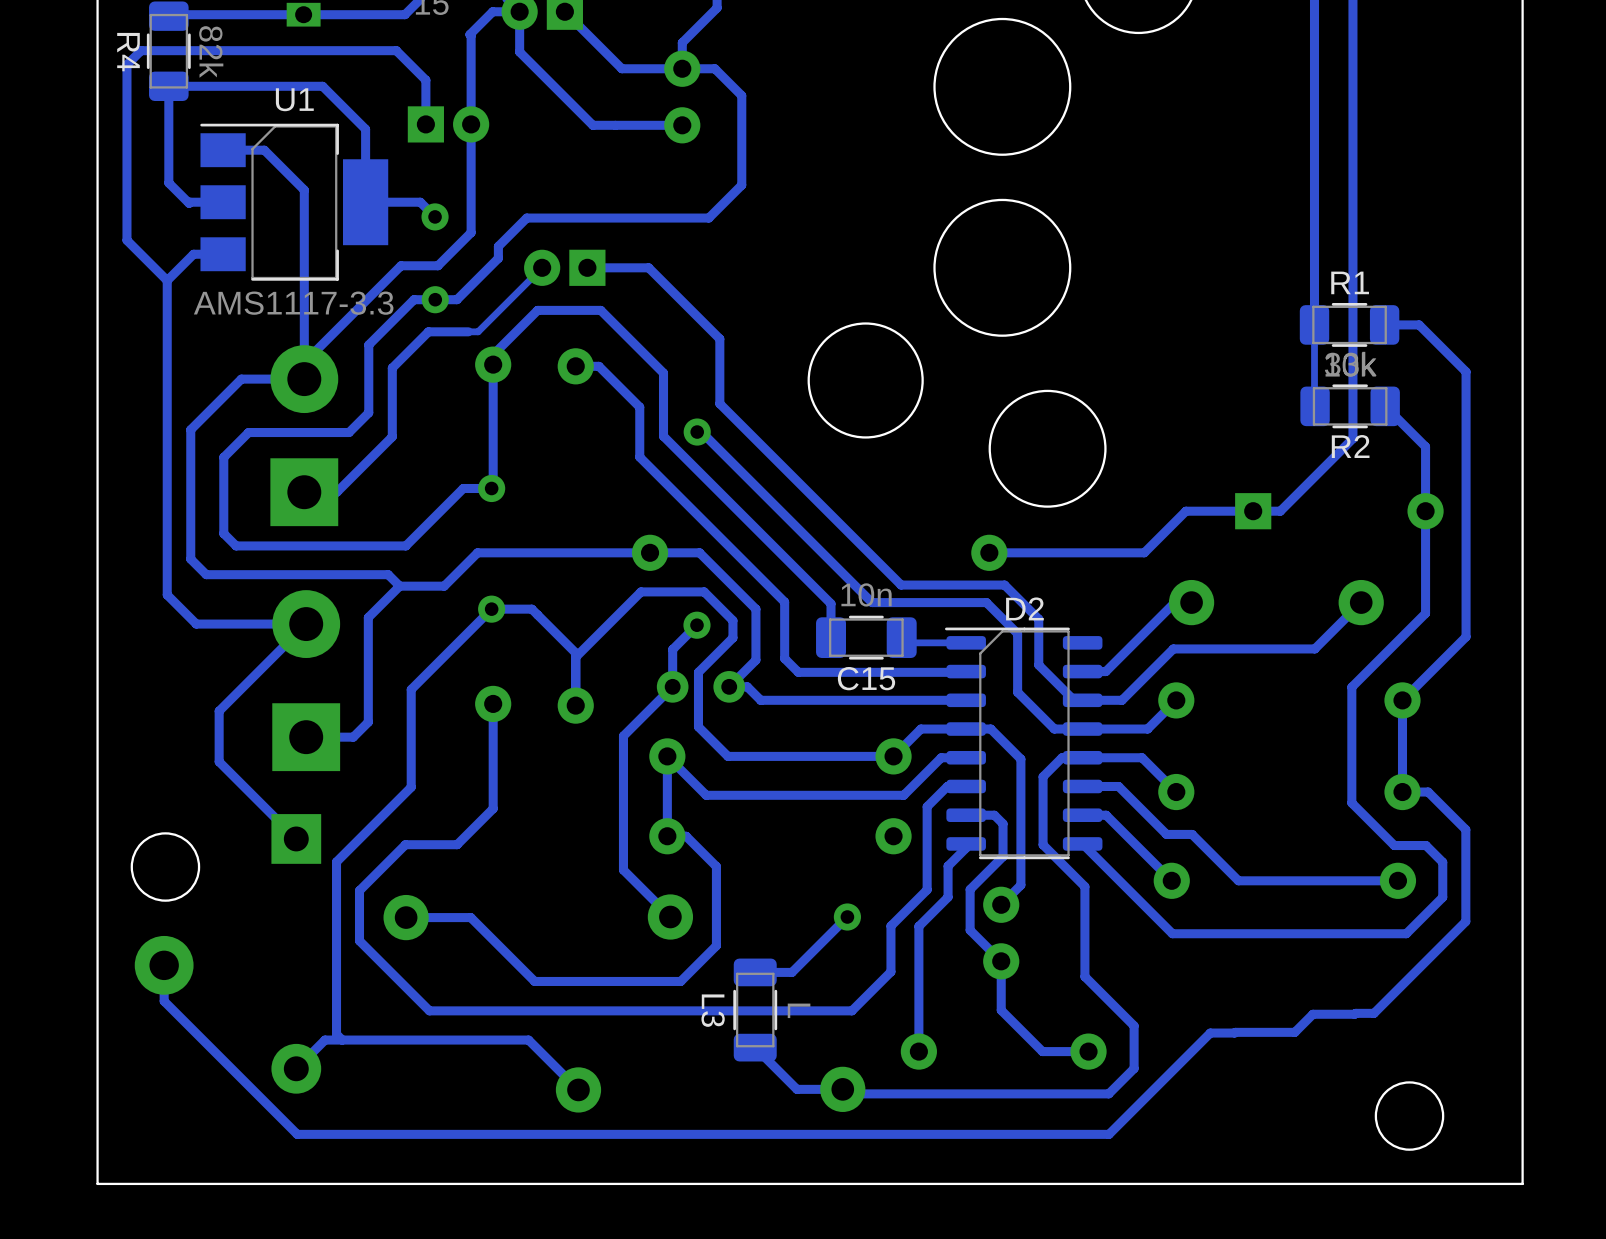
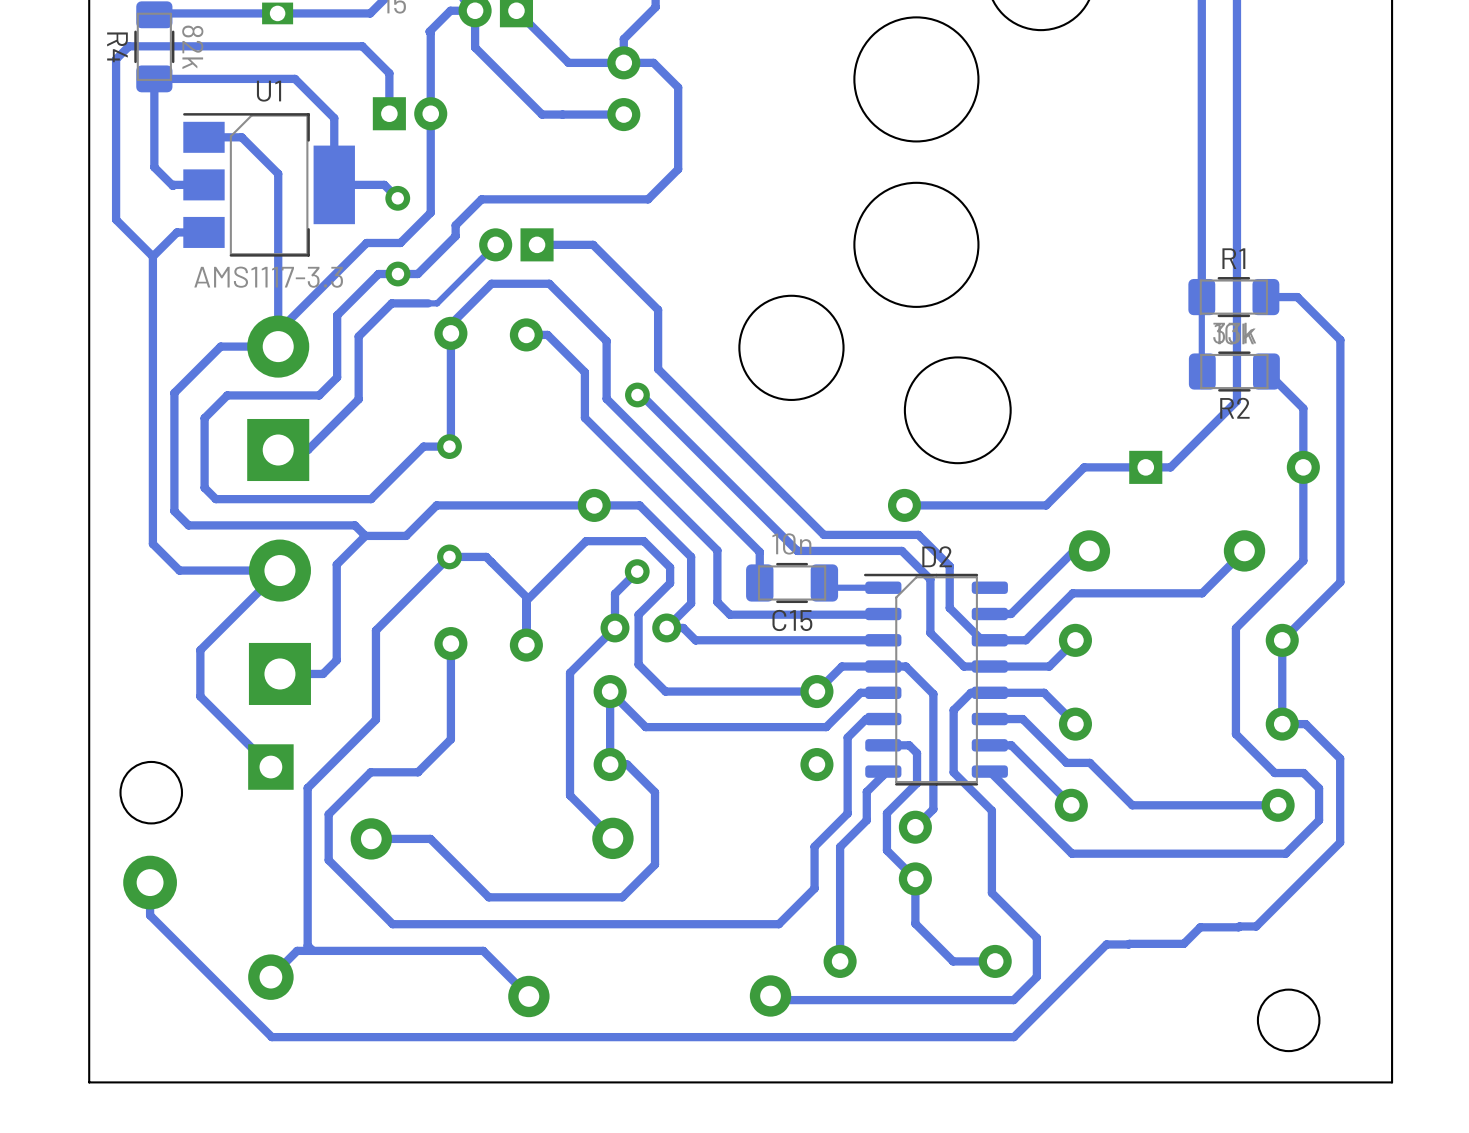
track: (847, 917) (791, 972) (755, 972) -> none
via: (847, 917) -> none
L3: L (755, 1010) -> none
track: (755, 1047) (796, 1089) (842, 1089) -> none

